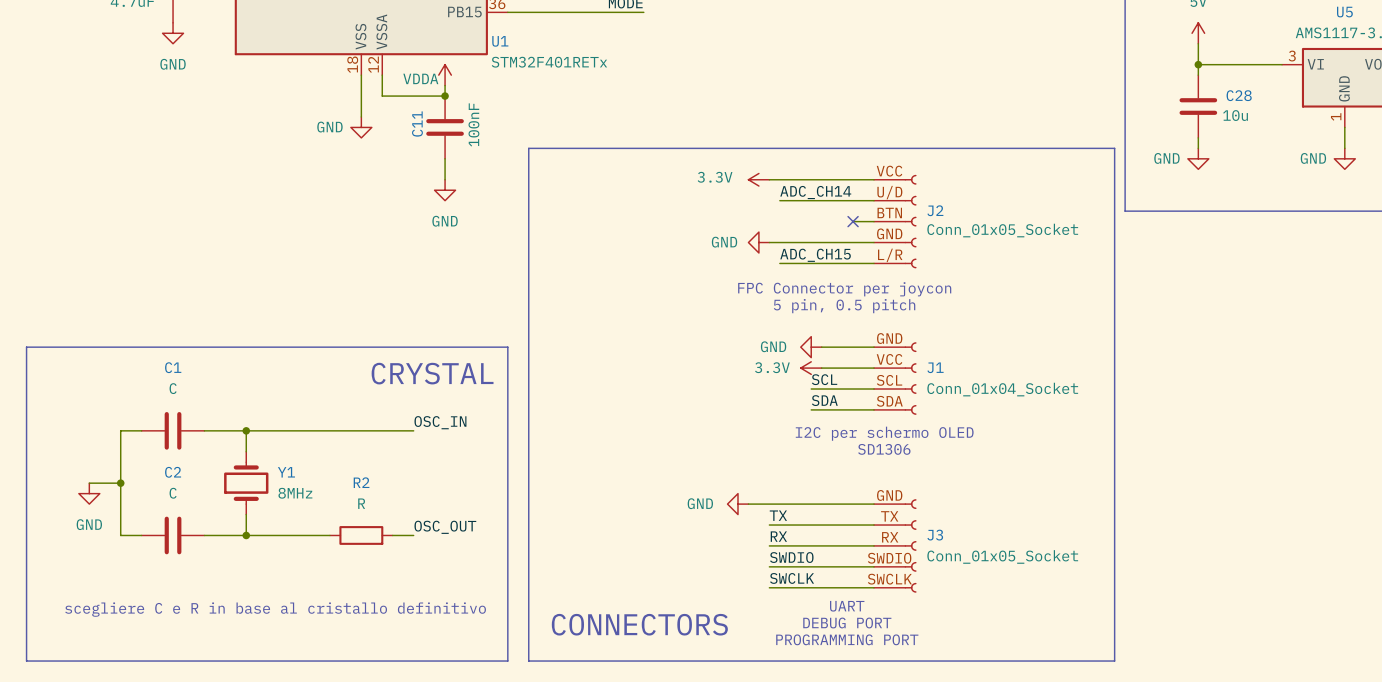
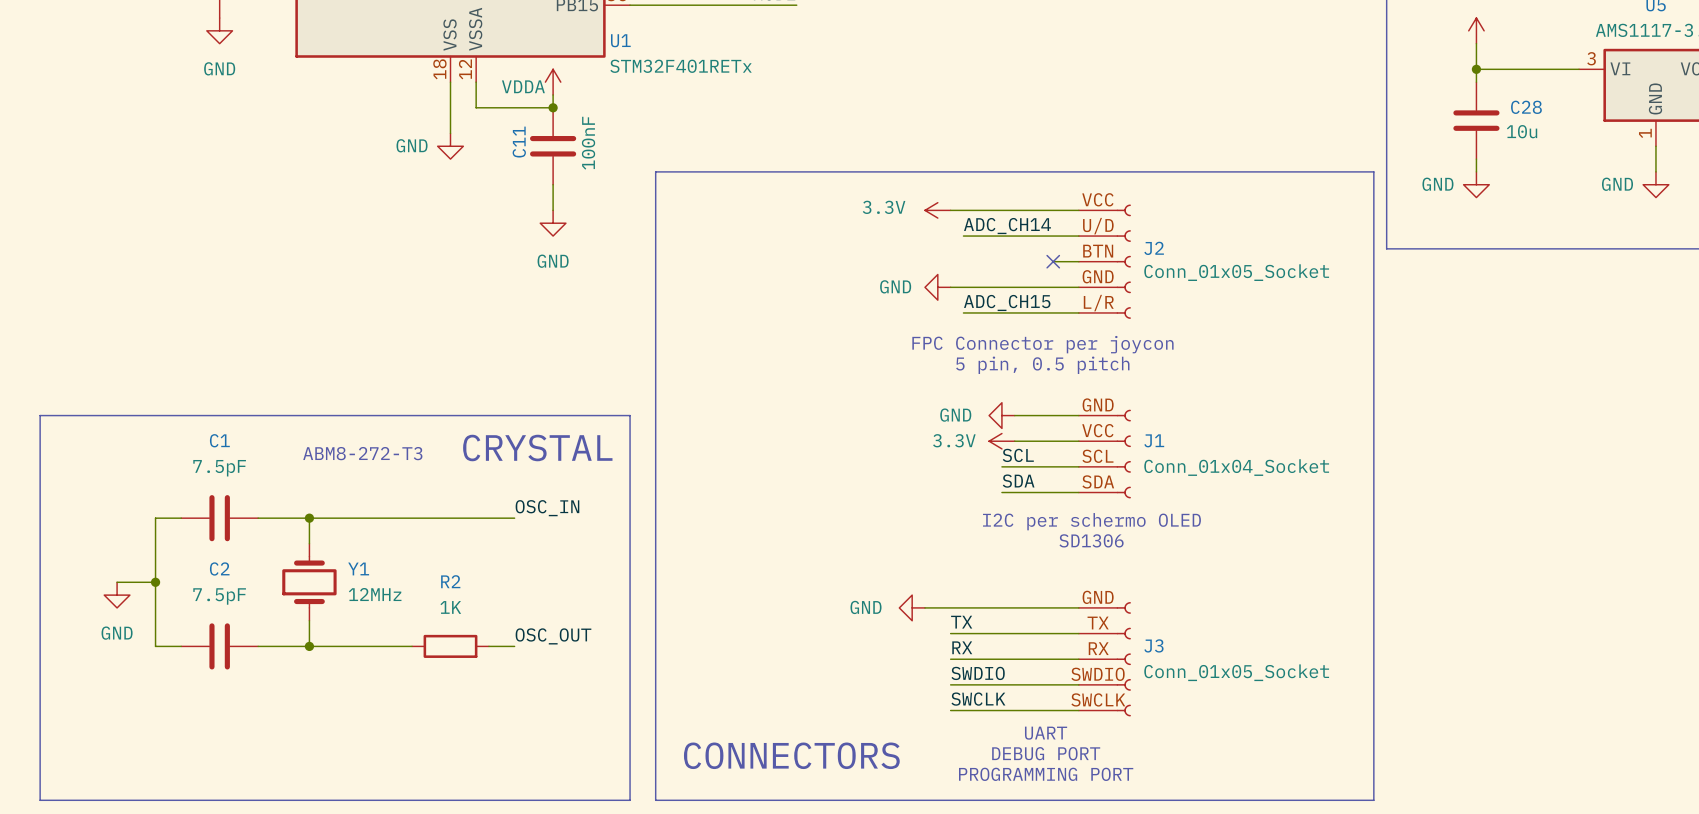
text: none -> ABM8-272-T3 (362, 453)
C1 value: C (173, 388) -> 7.5pF (219, 468)
C2 value: C (173, 493) -> 7.5pF (219, 596)
Y1 value: 8MHz (295, 493) -> 12MHz (375, 594)
R2 value: R (361, 503) -> 1K (450, 607)
text: scegliere C e R in base al cristallo definitivo (275, 609) -> none

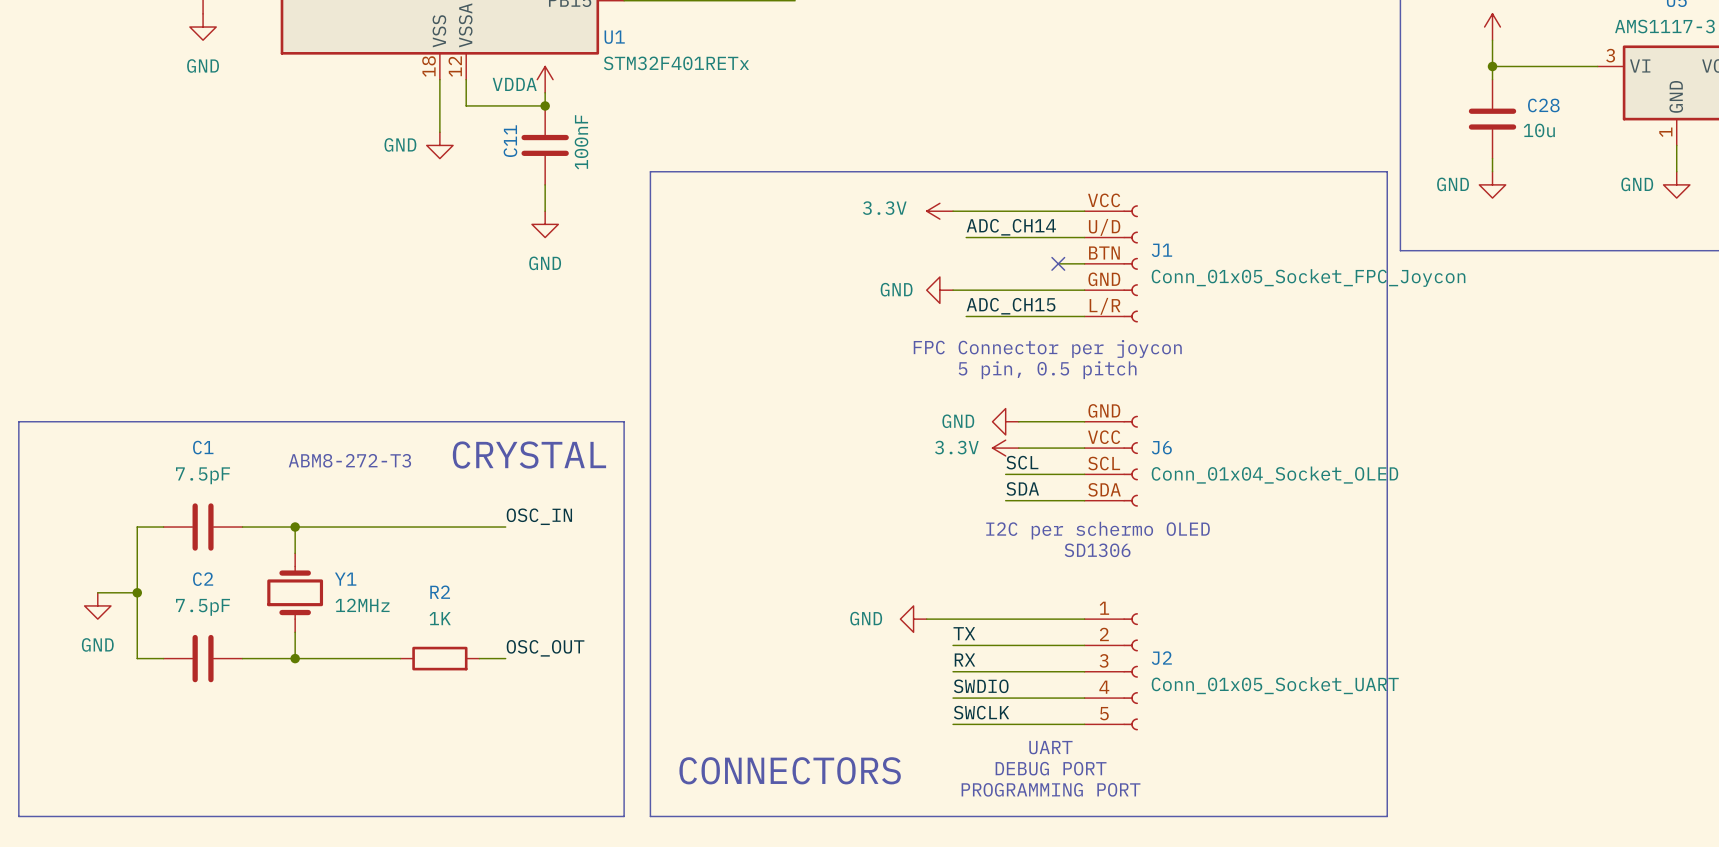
J2 name: J2 (1154, 248) -> J1 (1161, 250)
J2 value: Conn_01x05_Socket (1236, 272) -> Conn_01x05_Socket_FPC_Joycon (1308, 278)
J1 name: J1 (1154, 440) -> J6 (1161, 447)
J1 value: Conn_01x04_Socket (1236, 467) -> Conn_01x04_Socket_OLED (1274, 475)
J3 pin number: GND (1098, 597) -> 1 (1104, 608)
J3 pin number: TX (1098, 623) -> 2 (1104, 634)
J3 name: J3 (1153, 645) -> J2 (1161, 658)
J3 pin number: RX (1098, 648) -> 3 (1104, 660)
J3 value: Conn_01x05_Socket (1236, 672) -> Conn_01x05_Socket_UART (1275, 685)
J3 pin number: SWDIO (1098, 674) -> 4 (1104, 687)
J3 pin number: SWCLK (1098, 699) -> 5 (1104, 713)

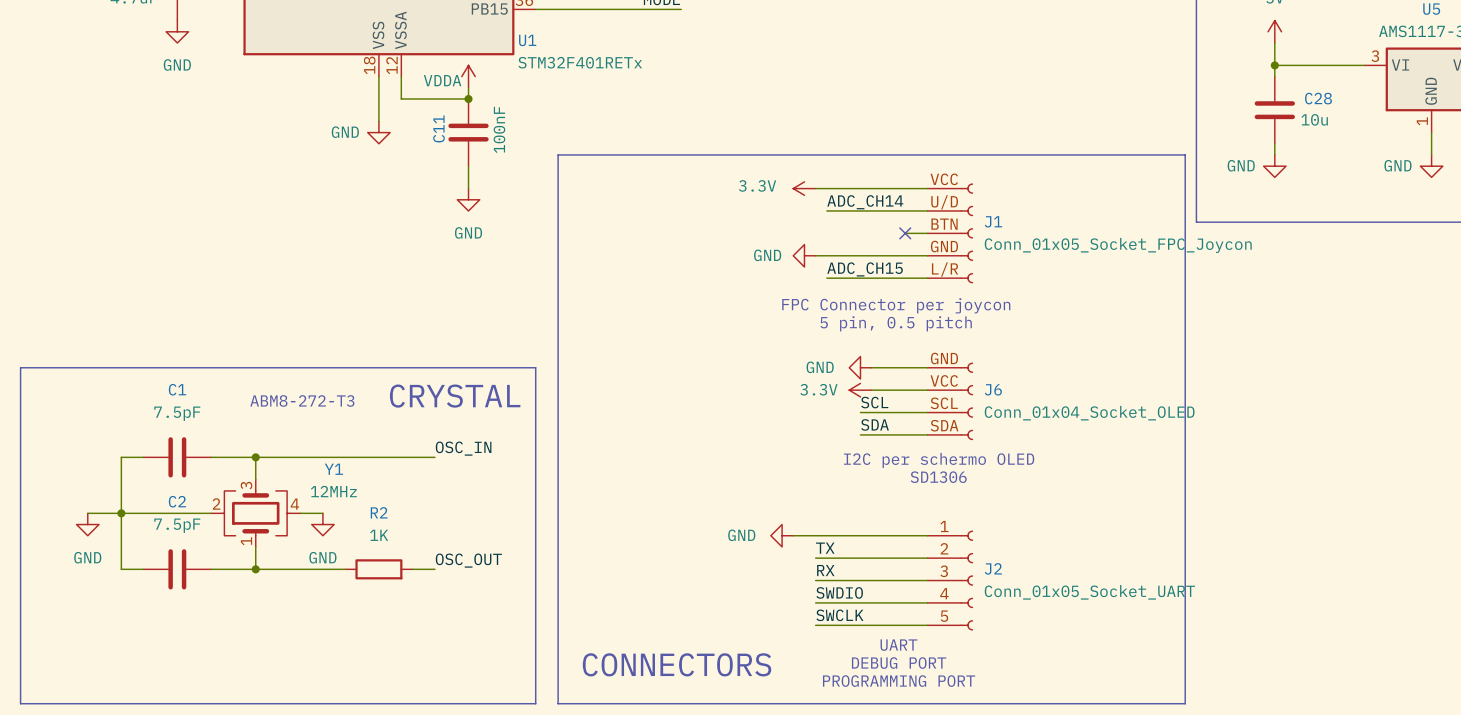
Y1 symbol: [267, 553, 324, 633] -> [210, 479, 301, 547]
Y1 name position: Y1 (345, 579) -> Y1 (333, 469)
wire: none -> (121, 513) (210, 513)
wire: none -> (300, 513) (322, 513)
Y1 value position: 12MHz (362, 605) -> 12MHz (333, 491)
power symbol: none -> GND (322, 524)

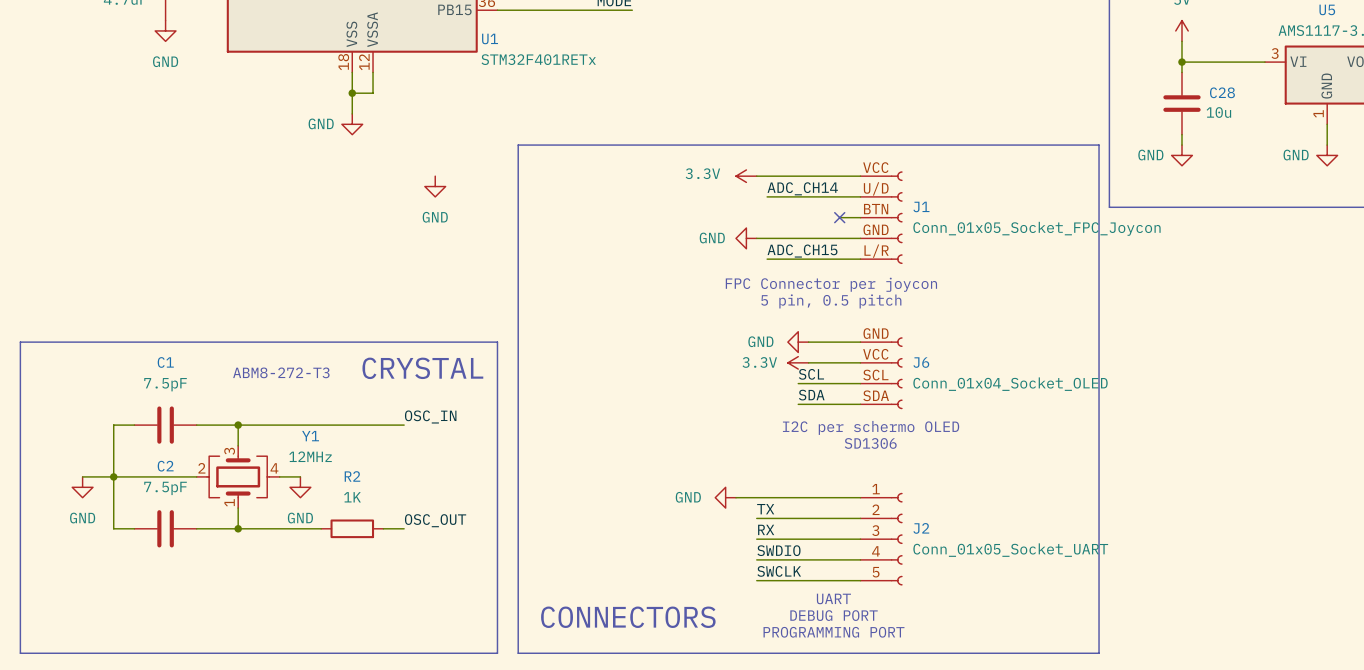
power symbol: VDDA (468, 76) -> none
wire: (468, 87) (468, 98) (401, 98) -> (352, 93) (373, 93)
junction: none -> (352, 93)
junction: (468, 98) -> none
C11: 100nF (468, 132) -> none
wire: (468, 166) (468, 188) -> none

